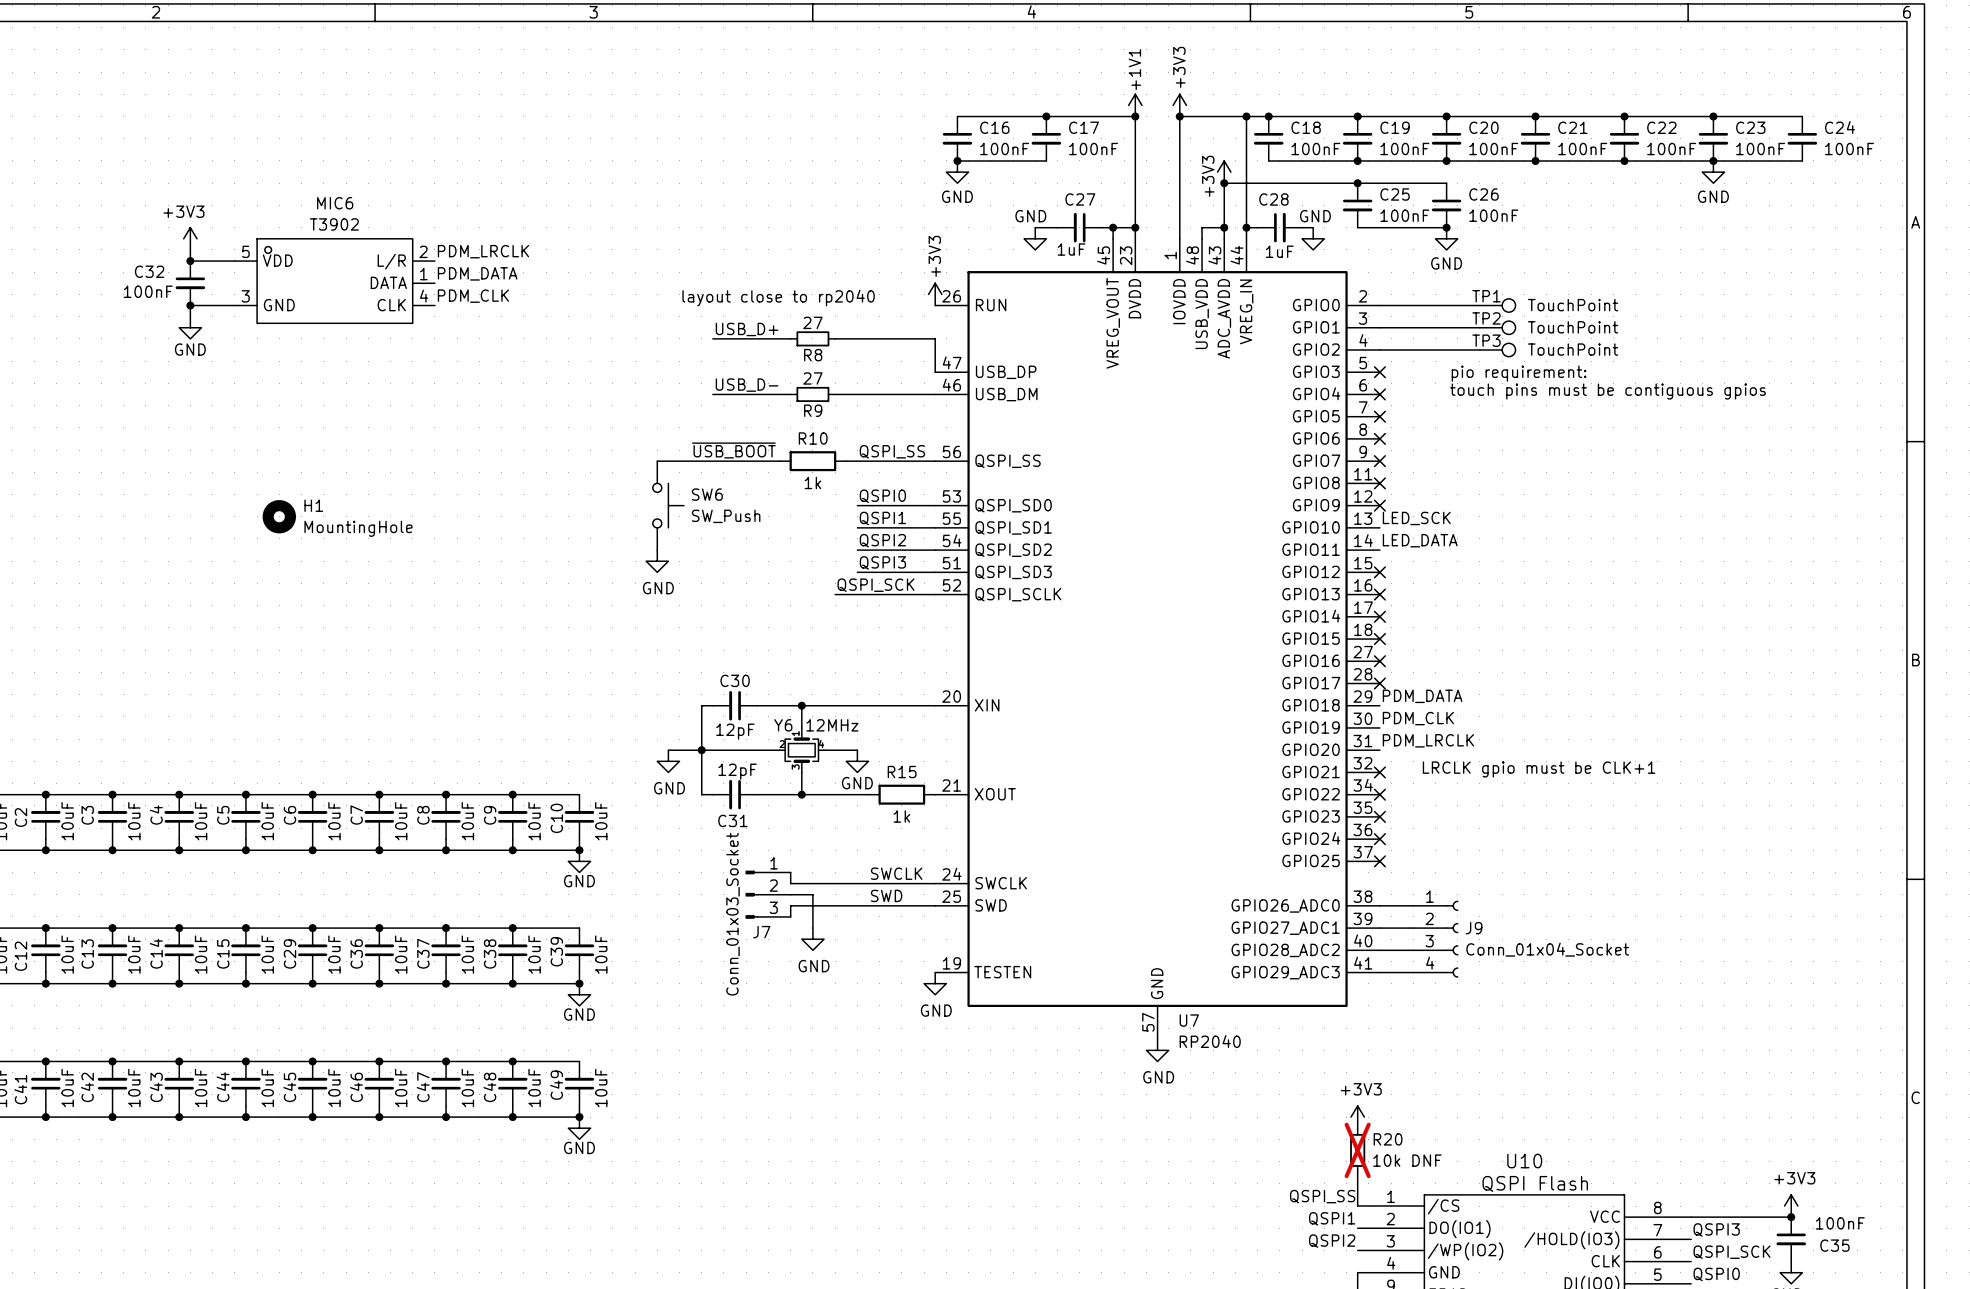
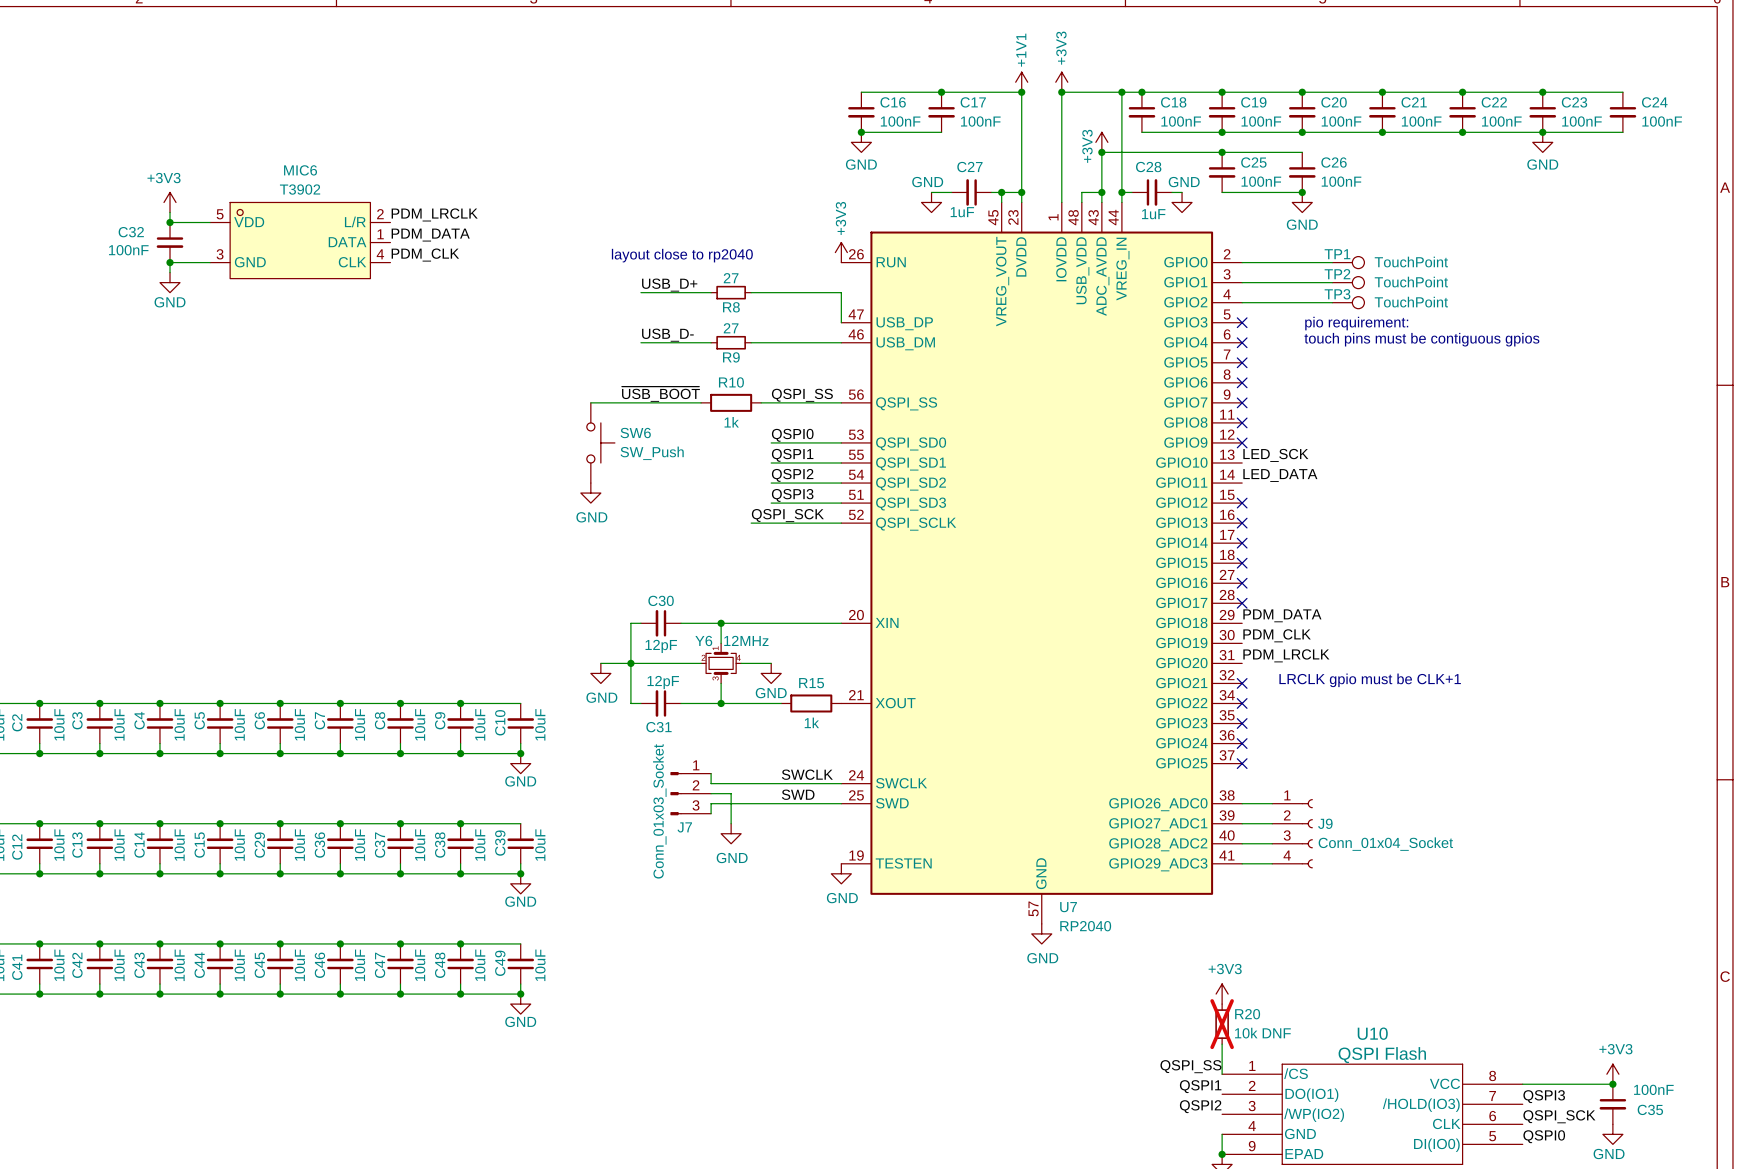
H1: MountingHole (279, 516) -> none

